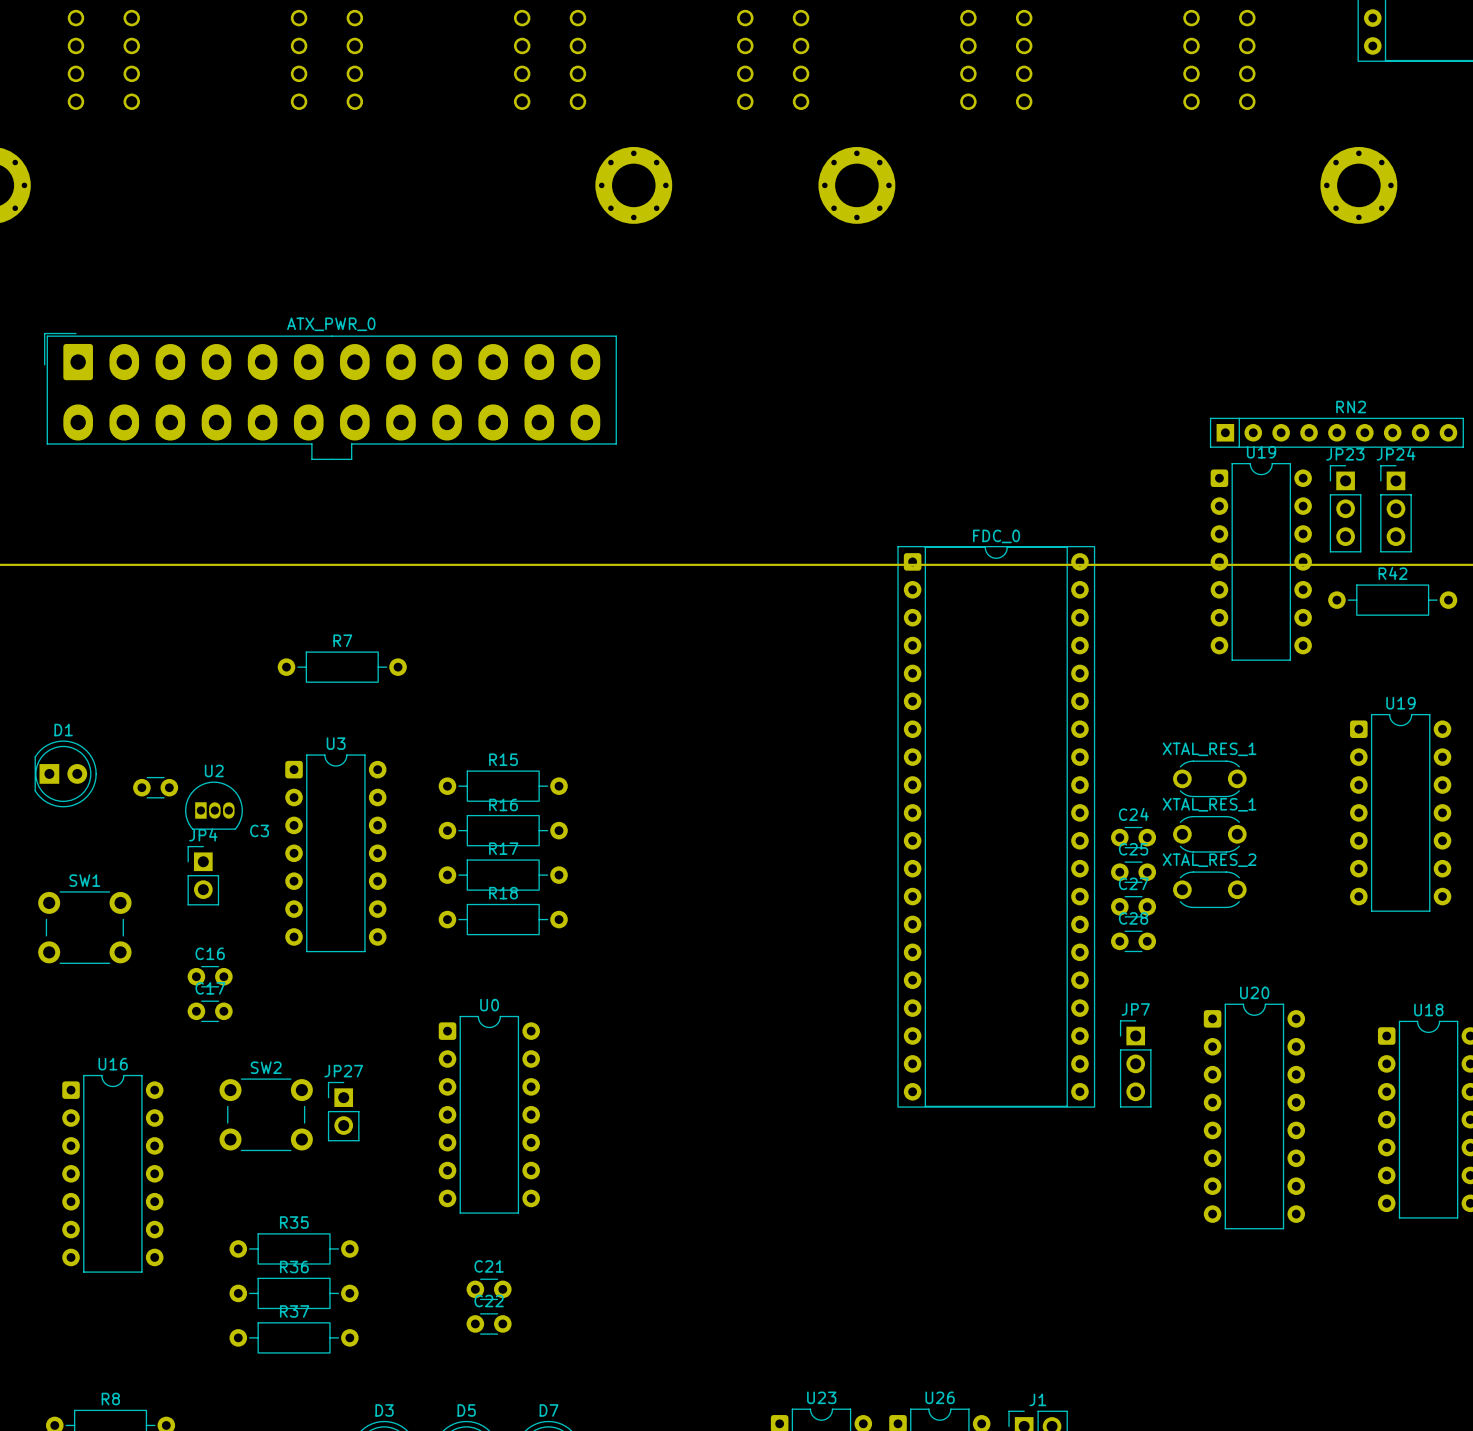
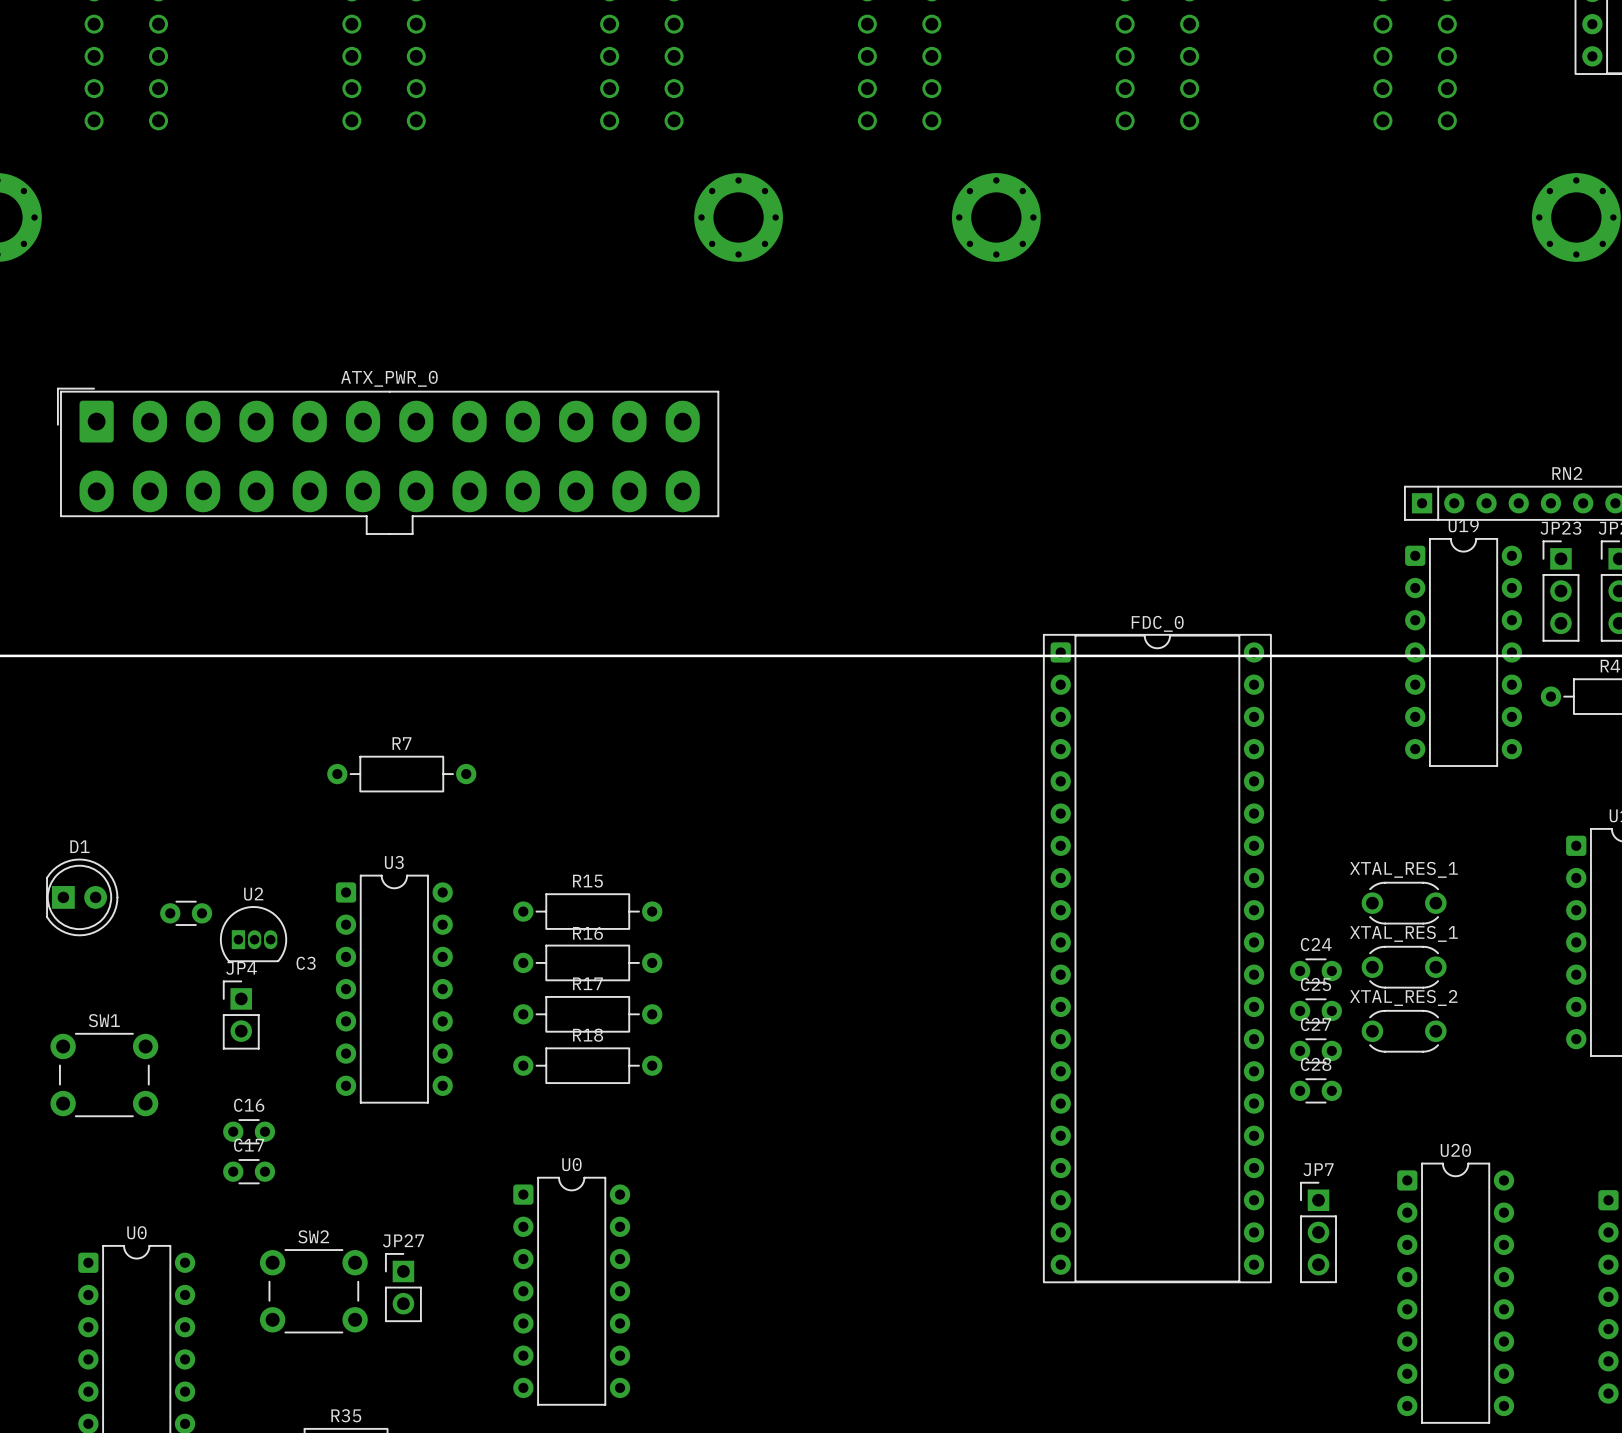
U16 name: U16 (113, 1064) -> U0 (136, 1232)

